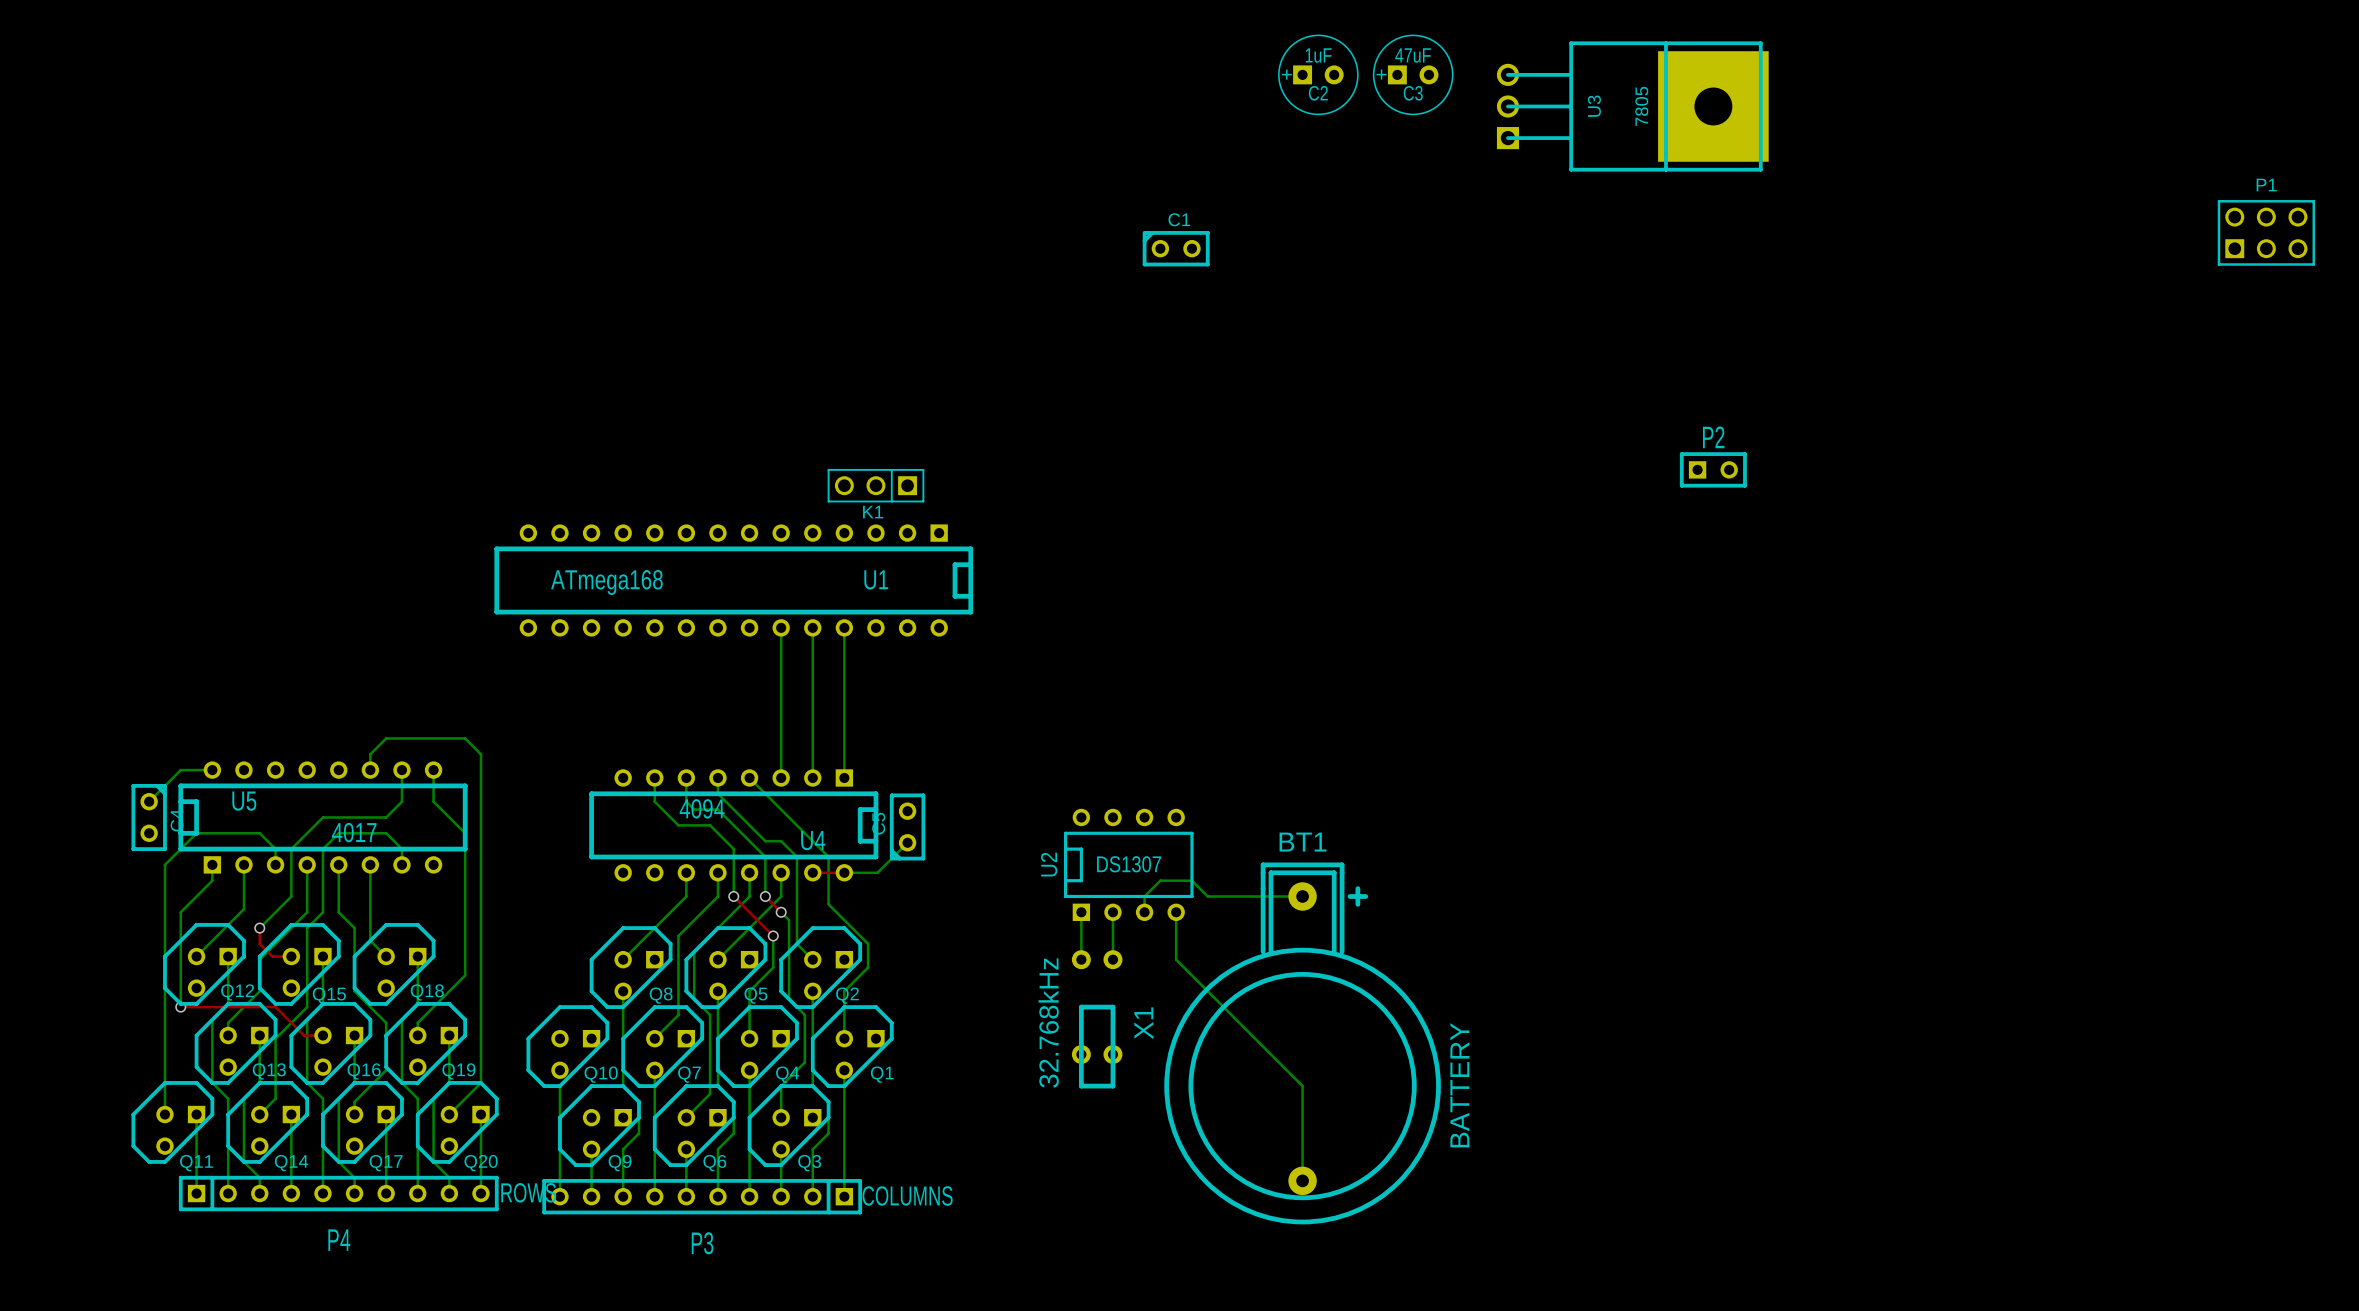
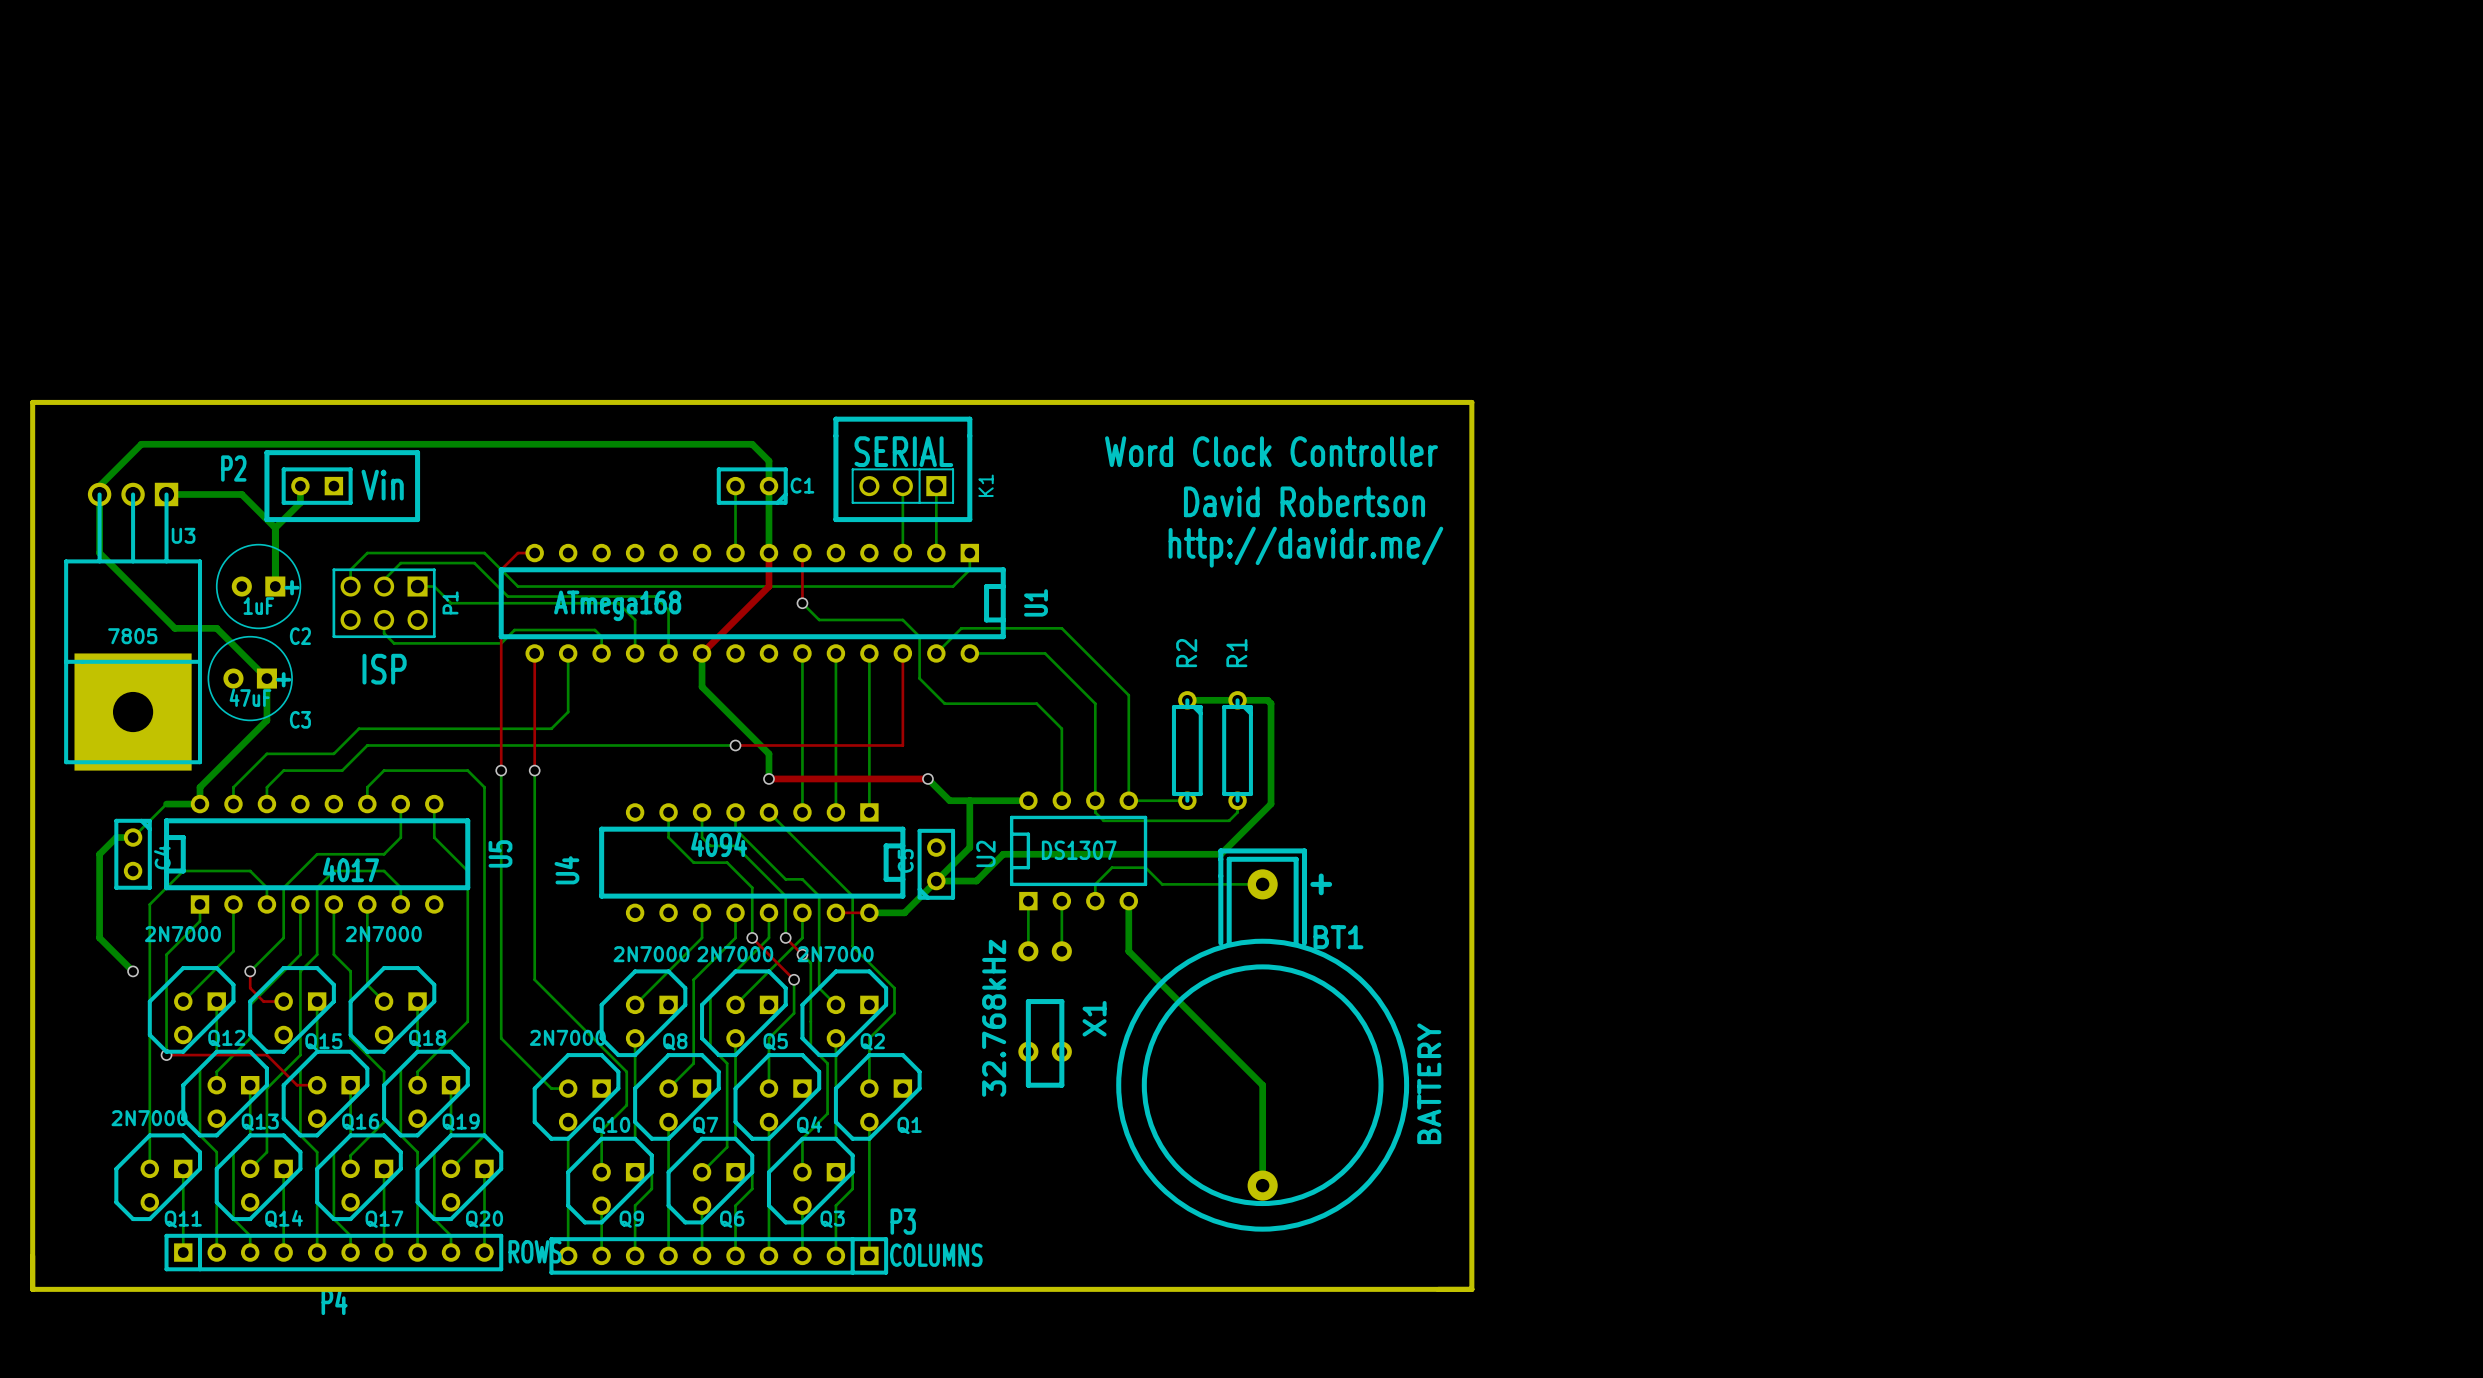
U3 footprint: [1496, 41, 1769, 172] -> [64, 482, 203, 771]
C2 rotation: 0° (1318, 74) -> 180° (258, 586)
C2 position: (1318, 74) -> (258, 586)
C3 rotation: 0° (1413, 74) -> 180° (250, 678)
C3 position: (1413, 74) -> (250, 678)
C2 name position: C2 (1318, 93) -> C2 (300, 636)
C3 name position: C3 (1413, 93) -> C3 (300, 719)
U3 name position: U3 (1594, 106) -> U3 (183, 535)
P1 name position: P1 (2266, 185) -> P1 (450, 602)
C1 name position: C1 (1179, 219) -> C1 (802, 485)
P1 rotation: 0° (2266, 232) -> 180° (384, 603)
P1 position: (2266, 232) -> (384, 603)
C1 rotation: 0° (1176, 248) -> 180° (752, 486)
C1 position: (1176, 248) -> (752, 486)
board edge: none -> (32, 402) (32, 1289) (1471, 1289) (1471, 402) (32, 402)
line: none -> (835, 419) (969, 419) (969, 519) (835, 519) (835, 419)
text: none -> Word Clock Controller (1271, 451)
text: none -> SERIAL (903, 451)
P2 name position: P2 (1713, 437) -> P2 (233, 468)
line: none -> (266, 452) (417, 452) (417, 519) (266, 519) (266, 452)
text: none -> Vin (382, 485)
bottom track: none -> (300, 486) (300, 502) (275, 527)
bottom track: none -> (735, 486) (735, 553)
bottom track: none -> (902, 486) (902, 553)
bottom track: none -> (936, 486) (936, 553)
P2 rotation: 0° (1713, 469) -> 180° (317, 486)
P2 position: (1713, 469) -> (317, 486)
bottom track: none -> (166, 494) (241, 494) (275, 527)
text: none -> David Robertson (1304, 501)
K1 position: (875, 485) -> (902, 486)
bottom track: none -> (275, 527) (275, 586)
K1 name rotation: 0° (873, 512) -> 90° counterclockwise (986, 485)
K1 name position: K1 (873, 512) -> K1 (986, 485)
text: none -> http://davidr.me/ (1305, 547)
top track: none -> (534, 553) (517, 553) (501, 569) (501, 770)
bottom track: none -> (768, 553) (768, 461) (752, 444) (141, 444) (99, 486) (99, 553) (174, 628) (216, 628) (266, 678) (266, 720) (200, 787) (200, 804) (166, 804)
top track: none -> (768, 553) (768, 586) (702, 653)
top track: none -> (802, 553) (802, 603)
bottom track: none -> (969, 553) (969, 569) (953, 586) (517, 586) (484, 553) (367, 553) (350, 569) (350, 586)
bottom track: none -> (384, 586) (384, 579) (400, 563) (474, 563) (507, 596) (655, 596) (668, 609) (668, 653)
bottom track: none -> (417, 586) (434, 586) (451, 603) (618, 603) (635, 619) (635, 653)
U1 name rotation: 0° (876, 579) -> 90° counterclockwise (1035, 602)
U1 name position: U1 (876, 579) -> U1 (1035, 602)
bottom track: none -> (802, 603) (819, 619) (902, 619) (919, 636) (919, 678) (944, 703) (1036, 703) (1061, 728) (1061, 800)
via: none -> (802, 603)
bottom track: none -> (384, 619) (384, 633) (394, 643) (501, 643) (514, 630) (594, 630) (601, 636) (601, 653)
top track: none -> (534, 653) (534, 770)
bottom track: none -> (568, 653) (568, 712) (551, 728) (358, 728) (333, 753) (266, 753) (233, 787) (233, 804)
bottom track: none -> (702, 653) (702, 686) (768, 753) (768, 778)
top track: none -> (902, 653) (902, 745) (735, 745)
bottom track: none -> (936, 653) (961, 628) (1061, 628) (1128, 695) (1128, 800) (1187, 800)
bottom track: none -> (969, 653) (1045, 653) (1095, 703) (1095, 812) (1103, 820) (1229, 820) (1237, 812) (1237, 800)
text: none -> ISP (384, 669)
bottom track: none -> (1187, 700) (1267, 700) (1271, 703) (1271, 804) (1220, 854) (1003, 854) (976, 881) (936, 881)
bottom track: none -> (735, 745) (367, 745) (342, 770) (283, 770) (266, 787) (266, 804)
via: none -> (735, 745)
R2: none -> (1187, 750)
R1: none -> (1237, 750)
bottom track: none -> (501, 770) (501, 1038) (551, 1088) (568, 1088)
via: none -> (501, 770)
bottom track: none -> (534, 770) (534, 979) (626, 1071) (626, 1105) (601, 1130) (601, 1172)
via: none -> (534, 770)
top track: none -> (768, 778) (927, 778)
via: none -> (768, 778)
bottom track: none -> (927, 778) (949, 800) (1028, 800)
via: none -> (927, 778)
bottom track: none -> (969, 800) (969, 847) (904, 912) (869, 912)
bottom track: none -> (133, 837) (116, 837) (99, 854) (99, 937) (133, 971)
U5 name rotation: 0° (244, 801) -> 90° counterclockwise (500, 853)
U5 name position: U5 (244, 801) -> U5 (500, 853)
U4 name rotation: 0° (813, 840) -> 90° counterclockwise (566, 870)
U4 name position: U4 (813, 840) -> U4 (566, 870)
BT1 name position: BT1 (1303, 842) -> BT1 (1338, 937)
bottom track: none -> (1128, 901) (1128, 951)
U2 name position: U2 (1049, 864) -> U2 (985, 853)
U2 position: (1128, 864) -> (1078, 850)
Q12 value: none -> 2N7000 (182, 934)
Q18 value: none -> 2N7000 (383, 934)
bottom track: (1302, 896) (1207, 896) (1191, 880) (1160, 880) (1144, 896) (1144, 912) -> (1262, 884) (1162, 884) (1145, 867) (1112, 867) (1095, 884) (1095, 901)
bottom track: none -> (1128, 951) (1262, 1085)
Q8 value: none -> 2N7000 (651, 954)
Q5 value: none -> 2N7000 (735, 954)
Q2 value: none -> 2N7000 (835, 954)
bottom track: (1081, 912) (1081, 959) -> (1028, 901) (1028, 951)
bottom track: (1112, 912) (1112, 959) -> (1061, 901) (1061, 951)
bottom track: (1176, 912) (1176, 959) (1302, 1086) (1302, 1180) -> none
via: none -> (133, 971)
Q10 value: none -> 2N7000 (567, 1037)
X1 position: (1097, 1019) -> (1045, 1014)
bottom track: none -> (1262, 1085) (1262, 1185) (1262, 1085)
BT1 position: (1302, 1043) -> (1262, 1040)
Q11 value: none -> 2N7000 (149, 1118)
P3 name position: P3 (702, 1243) -> P3 (903, 1221)

